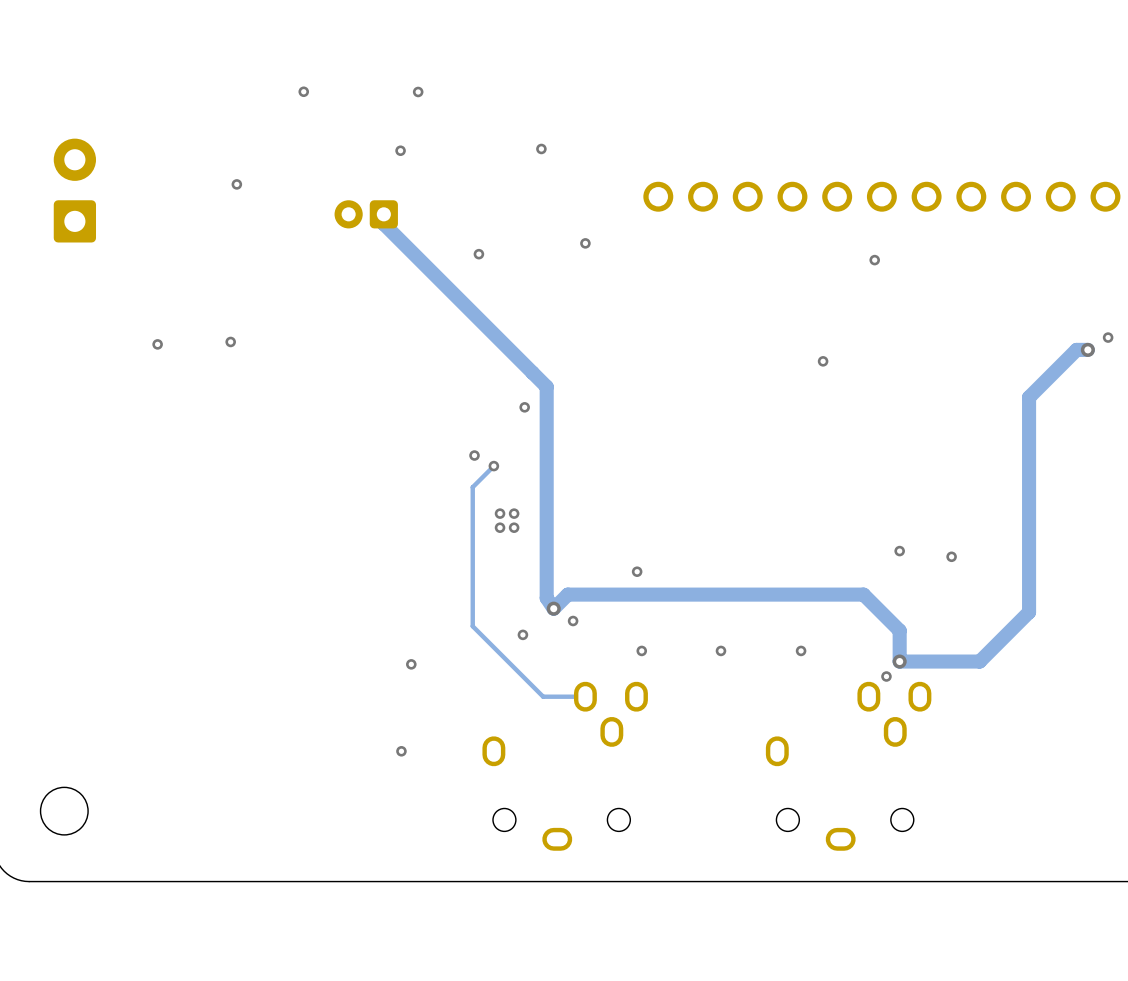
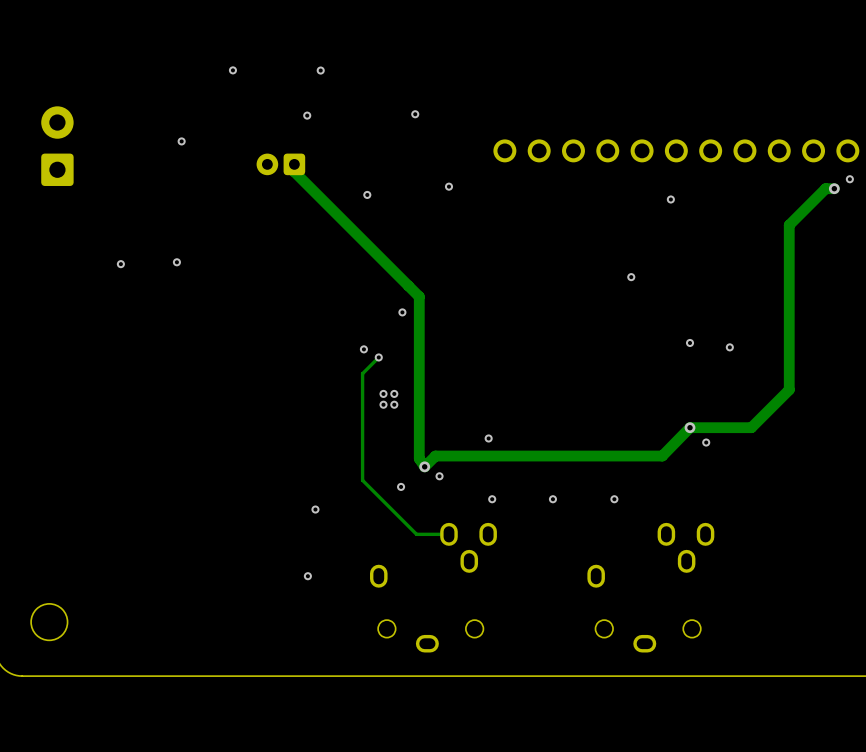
via: none -> (849, 179)
via: (1108, 337) -> none
track: (1087, 349) (1076, 349) (1029, 397) -> (834, 188) (825, 188) (789, 225) (789, 304)
via position: (1087, 349) -> (834, 188)
via: none -> (690, 342)
via: none -> (729, 347)
track: (1029, 508) (1029, 612) (979, 661) (899, 661) (899, 630) (863, 594) -> (789, 389) (751, 427) (690, 427) (662, 456)
via: (899, 551) -> none
via: (951, 556) -> none
via: none -> (706, 442)
via position: (899, 661) -> (690, 427)
via: (886, 676) -> none

